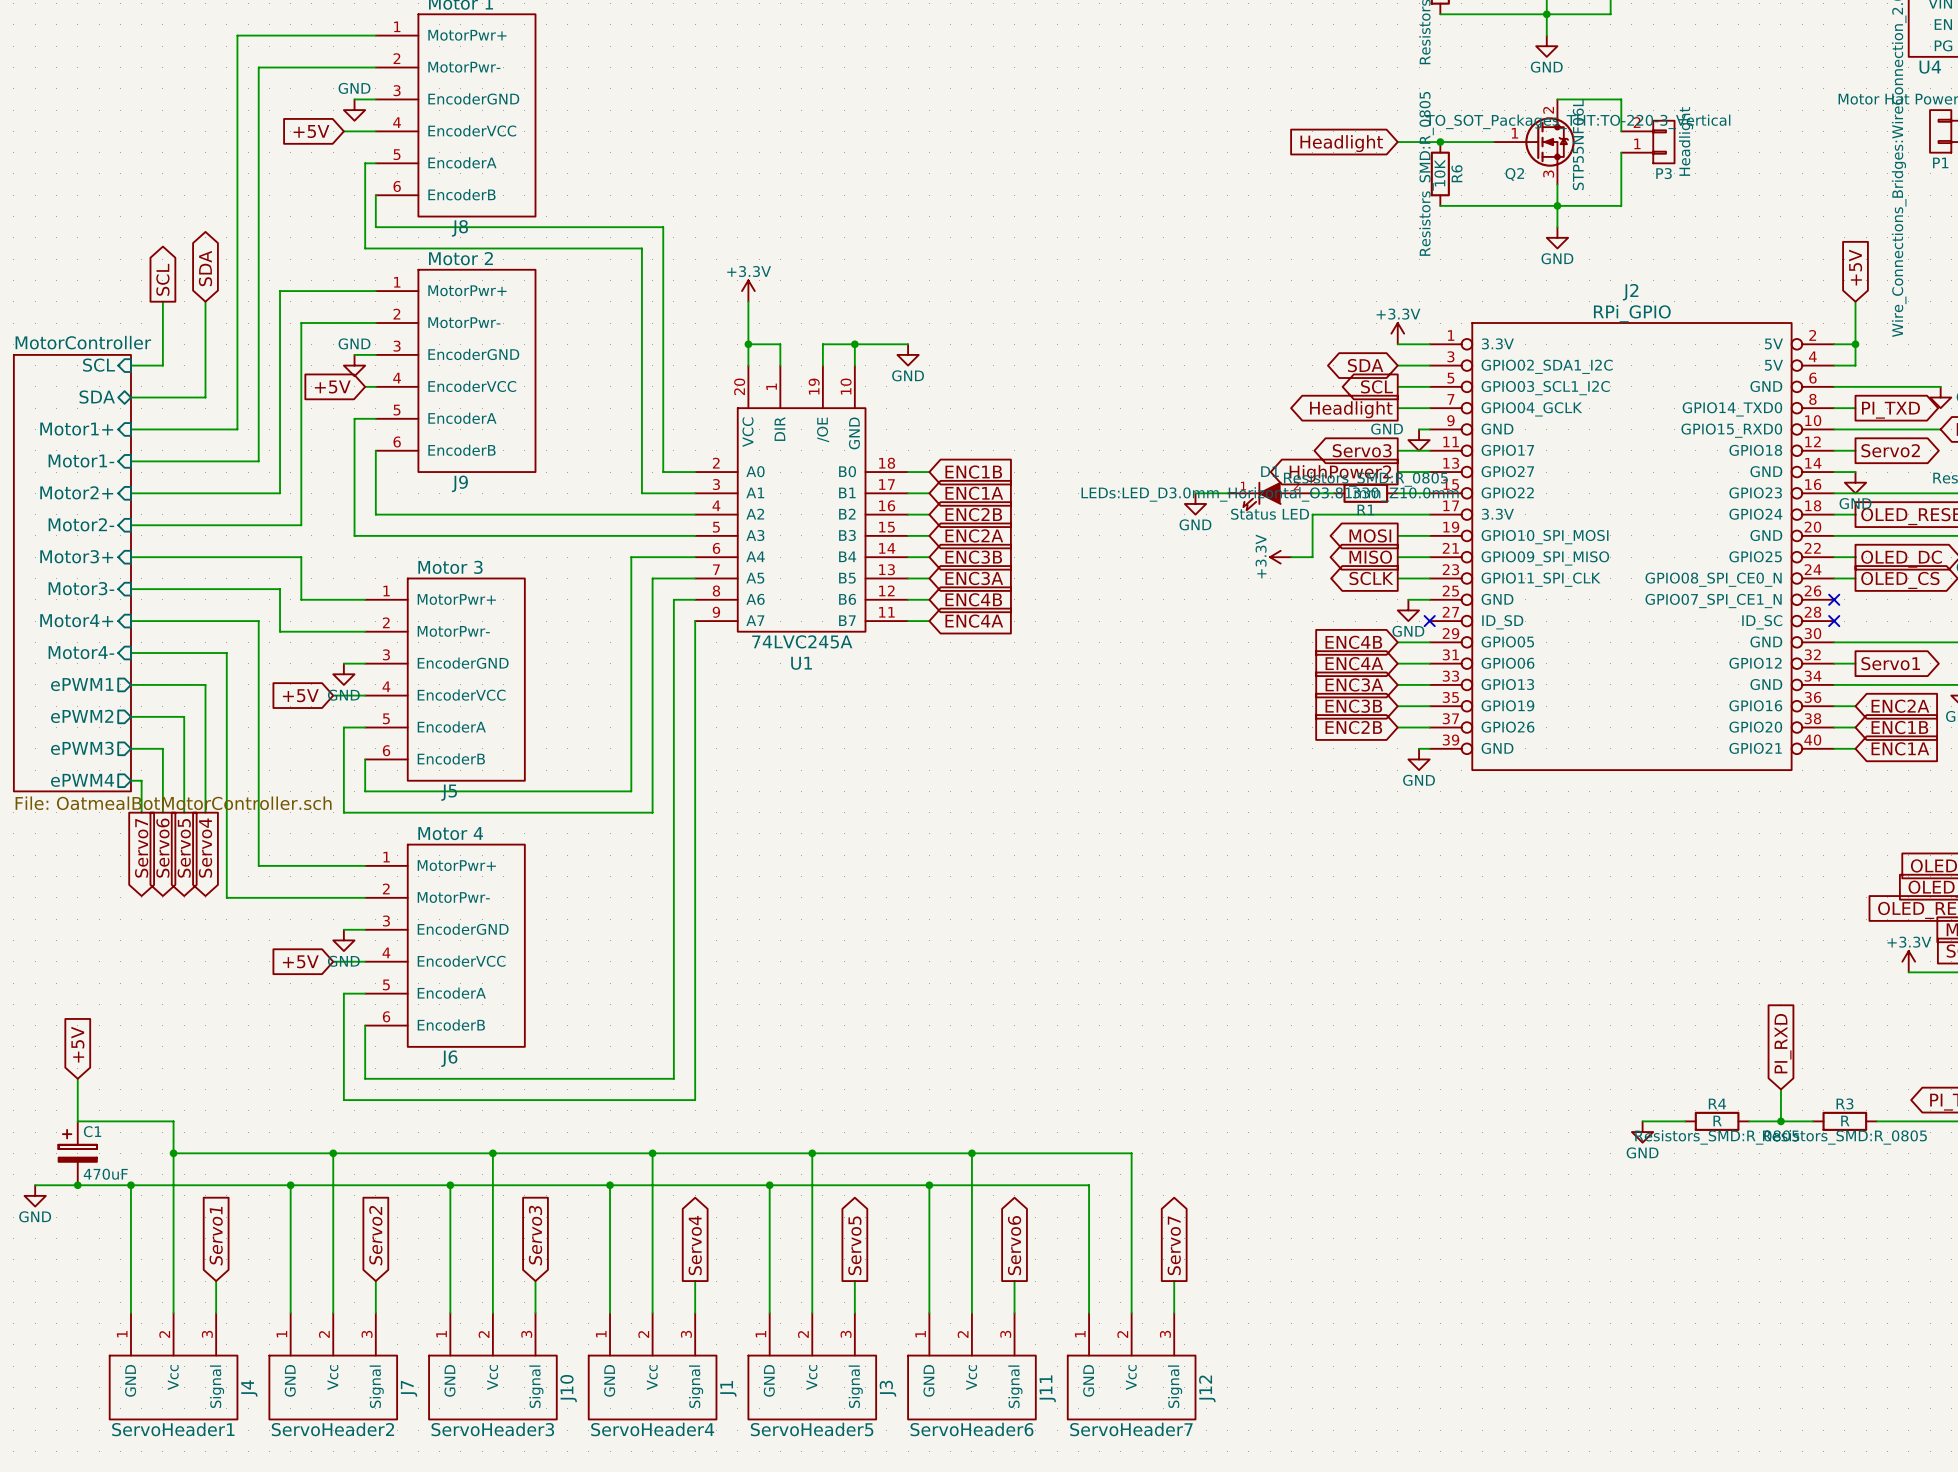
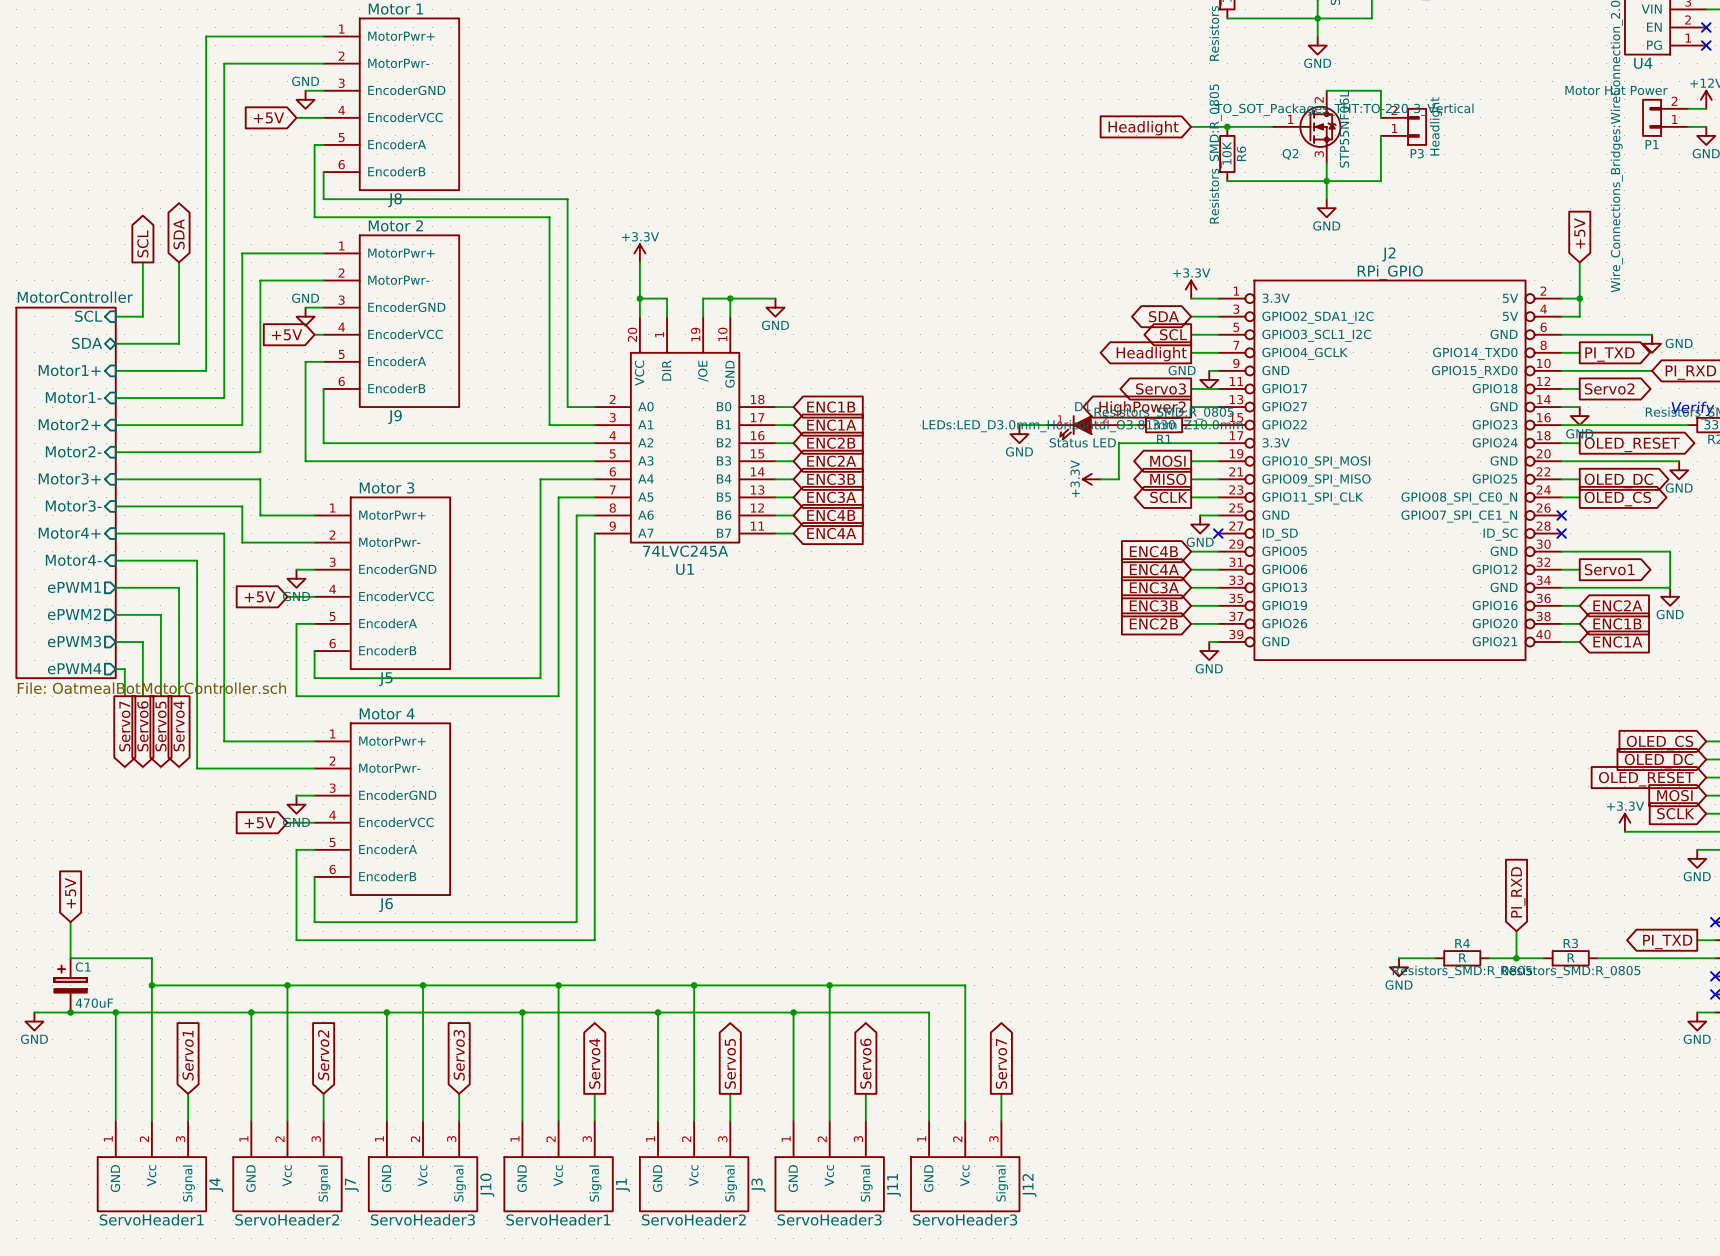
J1 value: ServoHeader4 (652, 1429) -> ServoHeader1 (558, 1219)
J3 value: ServoHeader5 (812, 1429) -> ServoHeader2 (693, 1219)
J11 value: ServoHeader6 (971, 1429) -> ServoHeader3 (829, 1219)
J12 value: ServoHeader7 (1131, 1429) -> ServoHeader3 (965, 1219)

